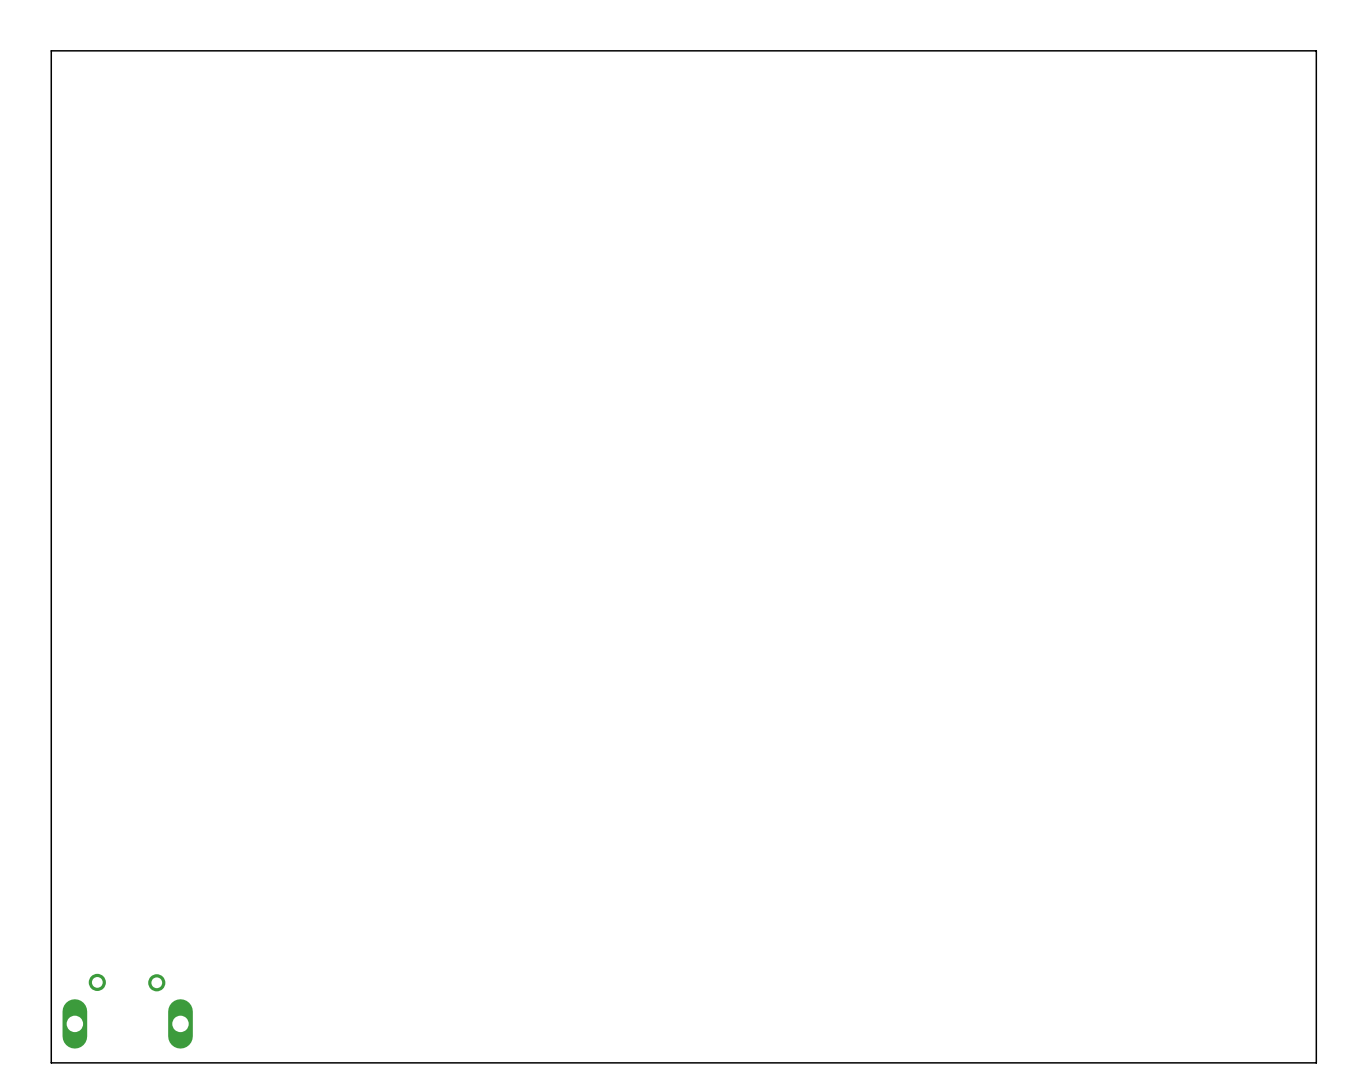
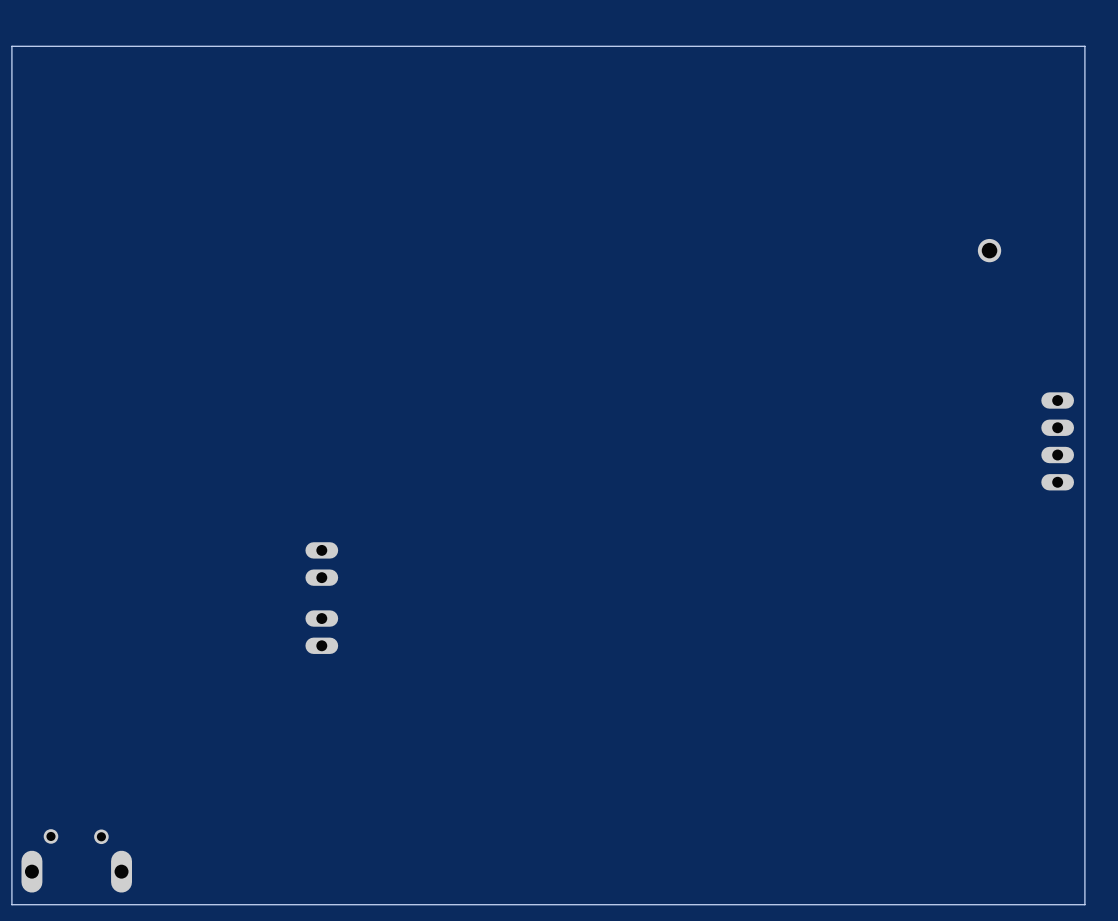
part: none -> (989, 250)
part: none -> (1057, 441)
part: none -> (321, 564)
part: none -> (321, 632)

